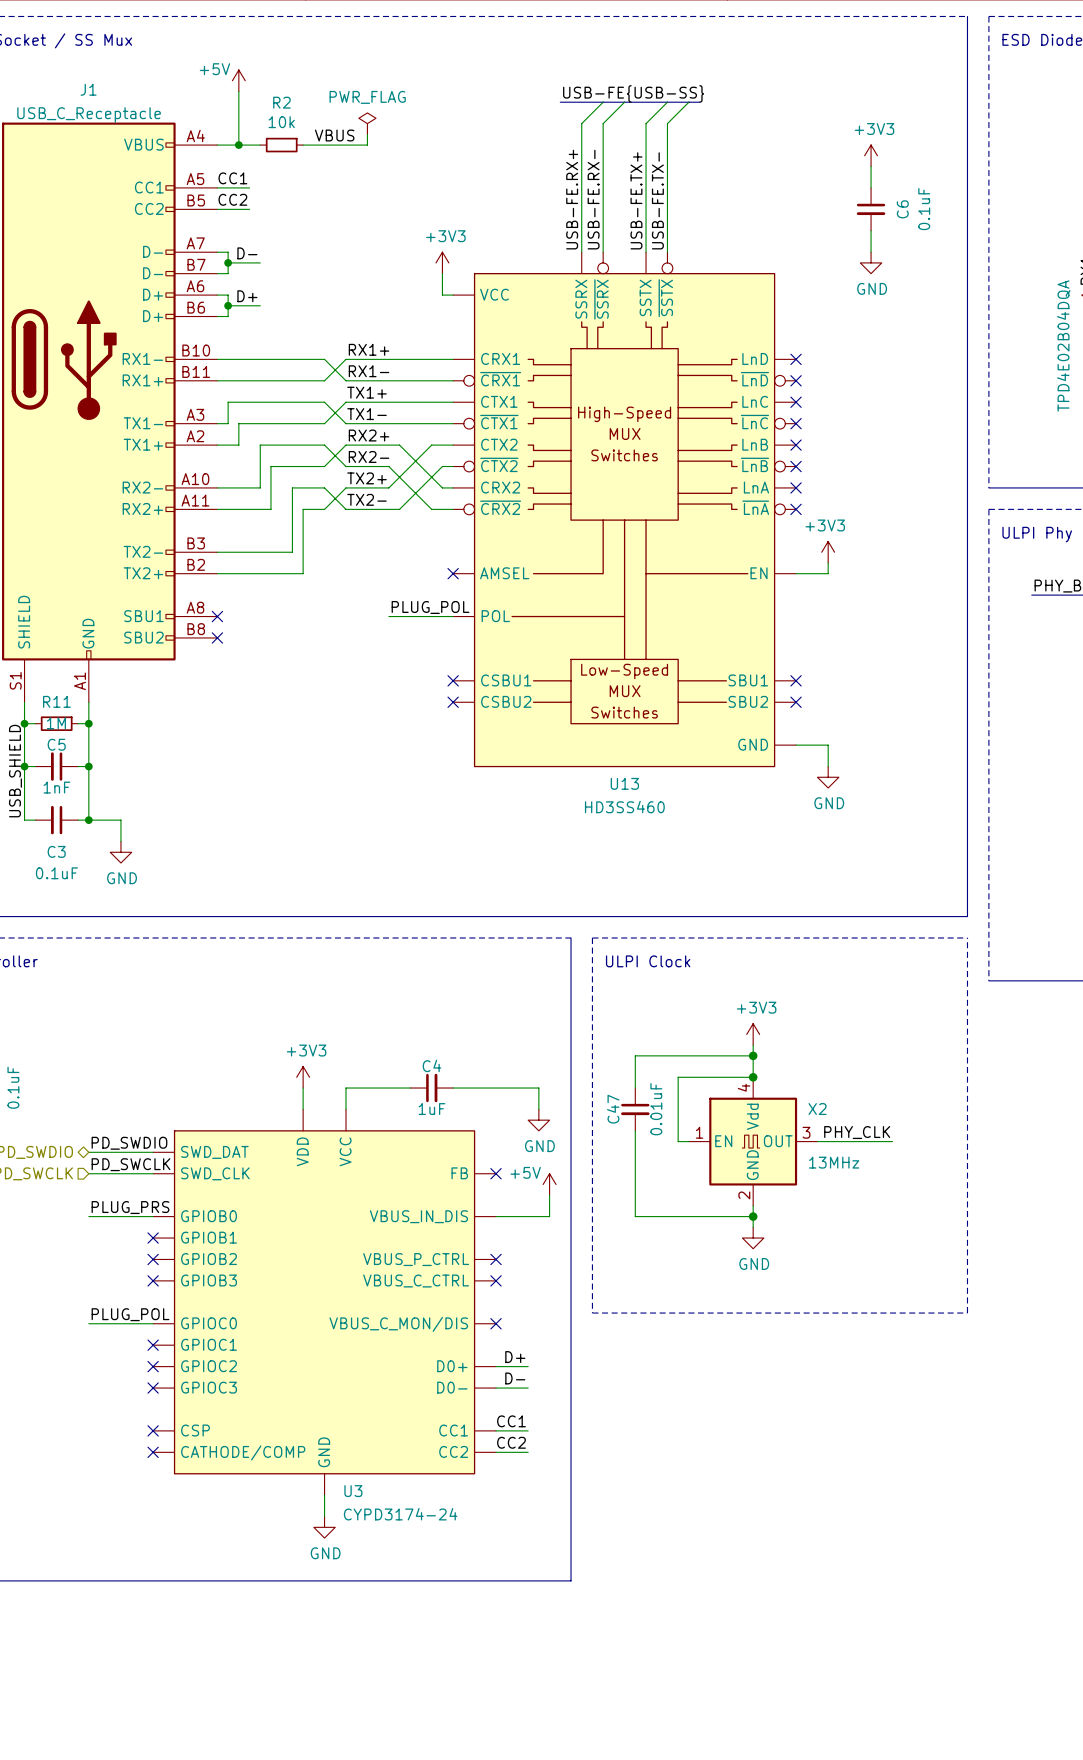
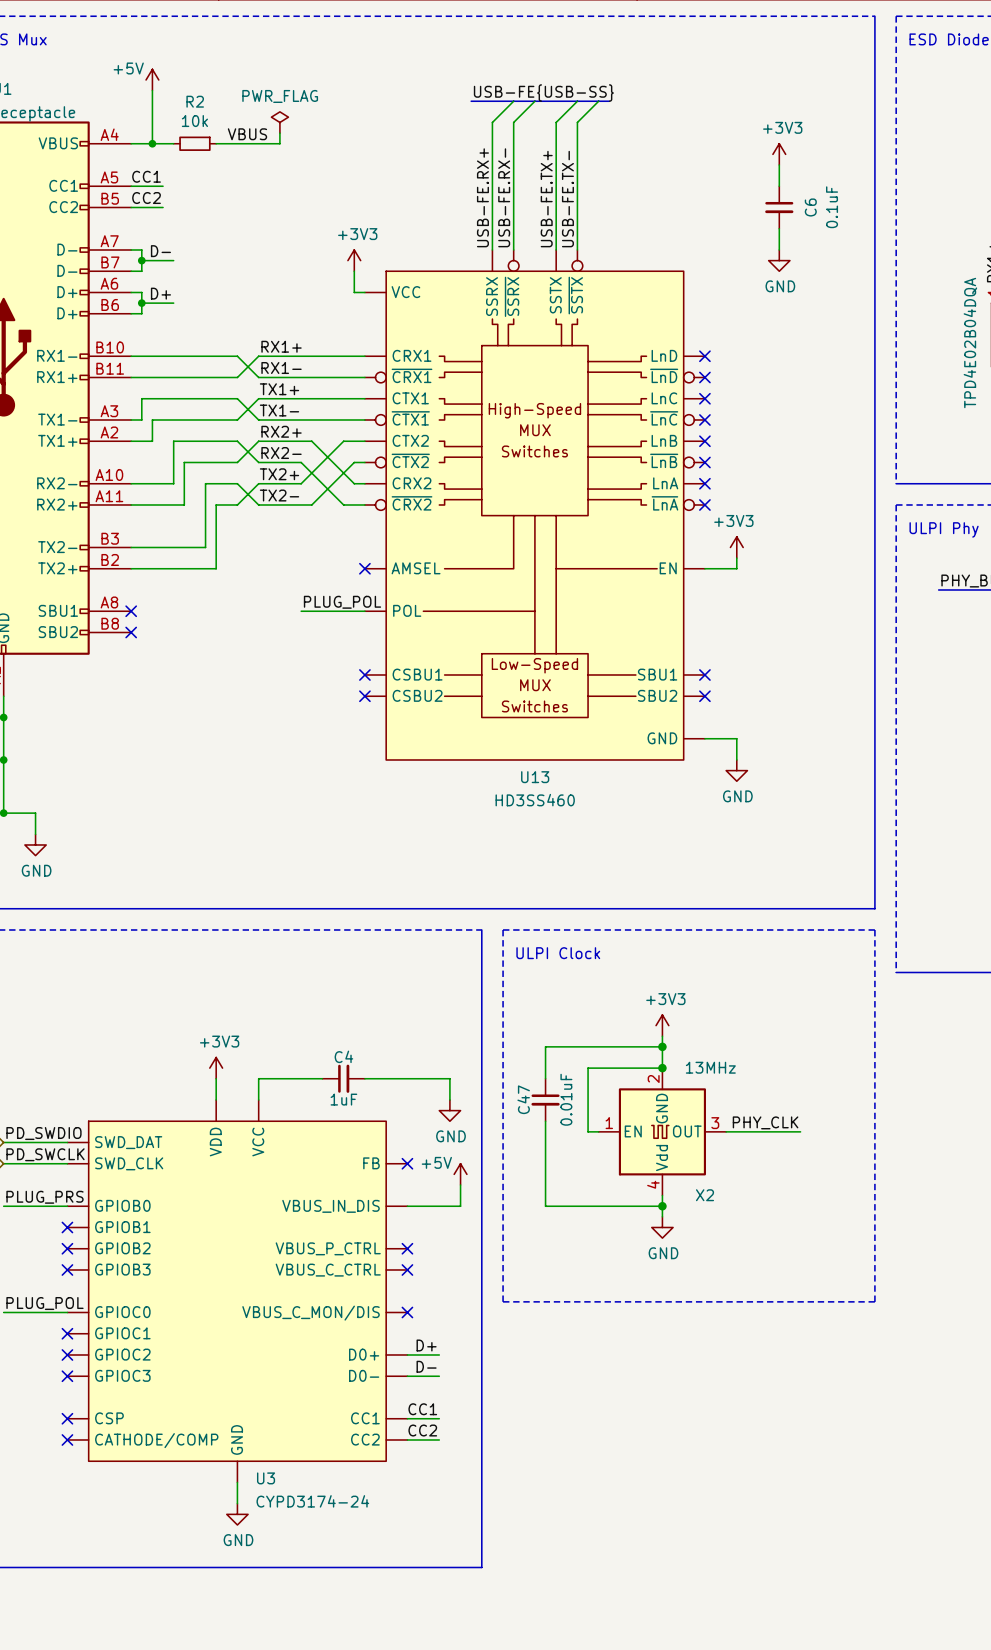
X2 name position: X2 (817, 1109) -> X2 (705, 1195)
X2 flip: as is (753, 1141) -> up-down (662, 1131)
X2 value position: 13MHz (834, 1162) -> 13MHz (710, 1067)

